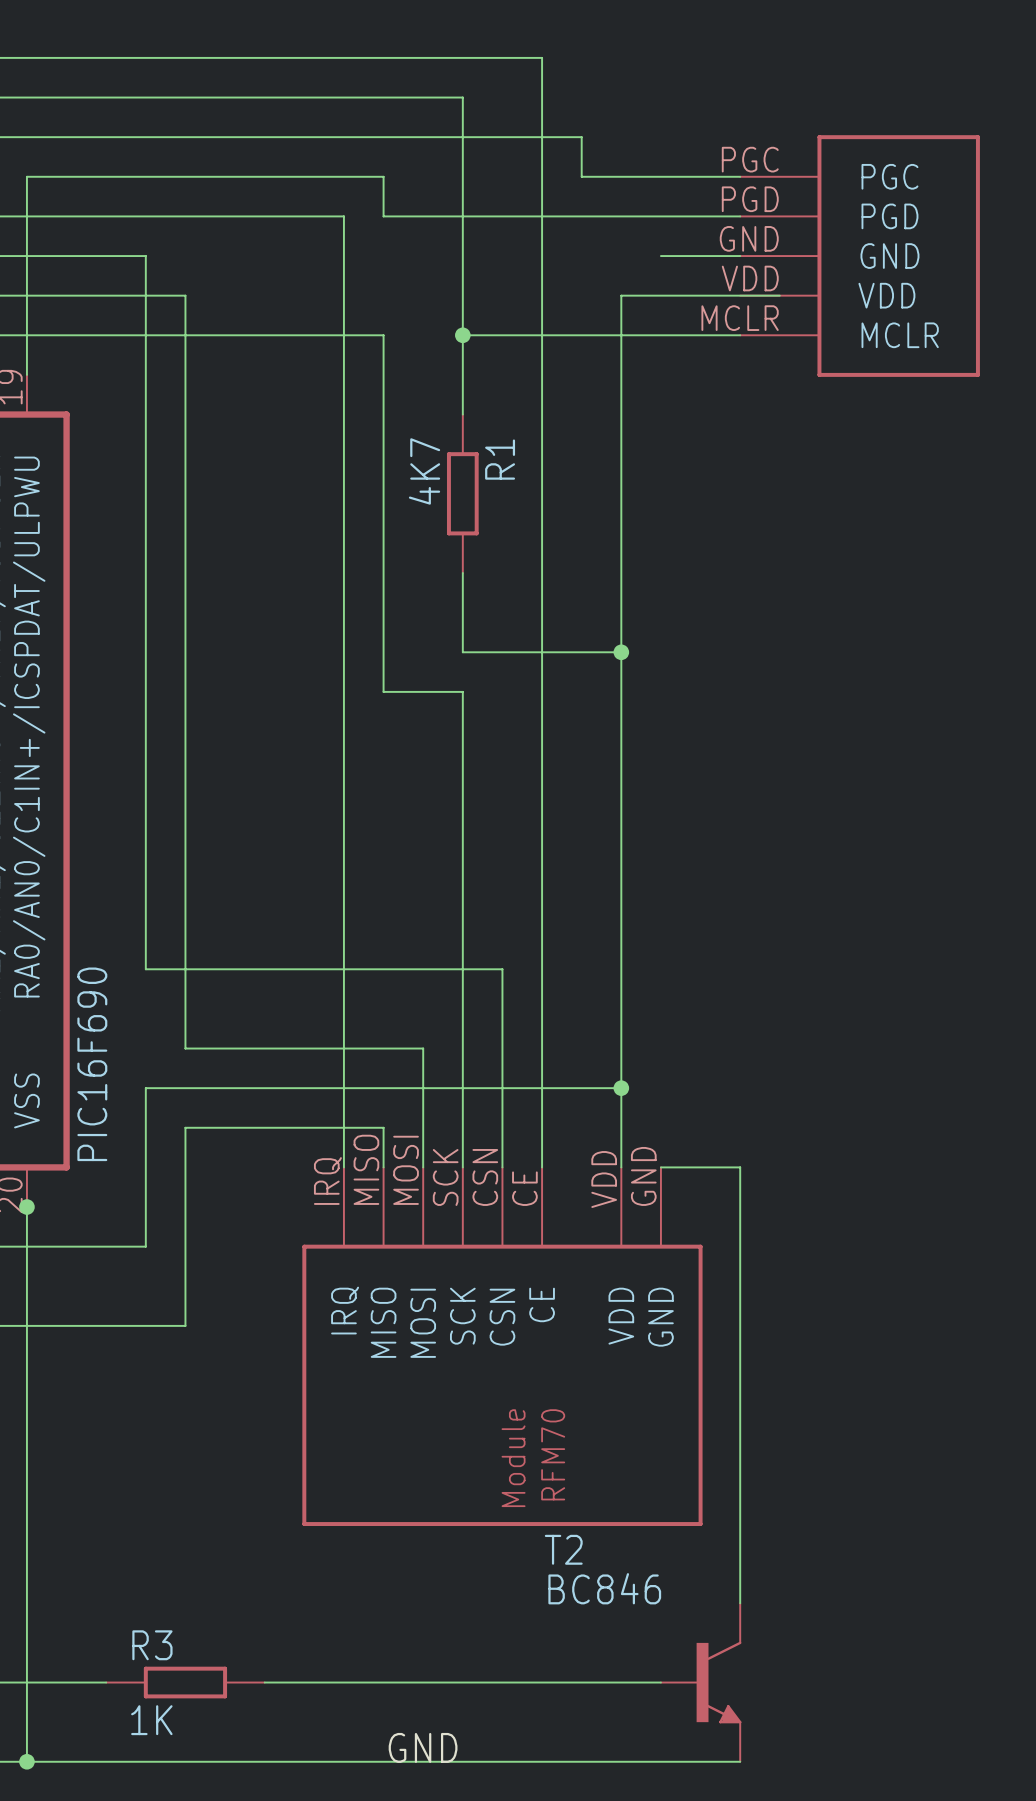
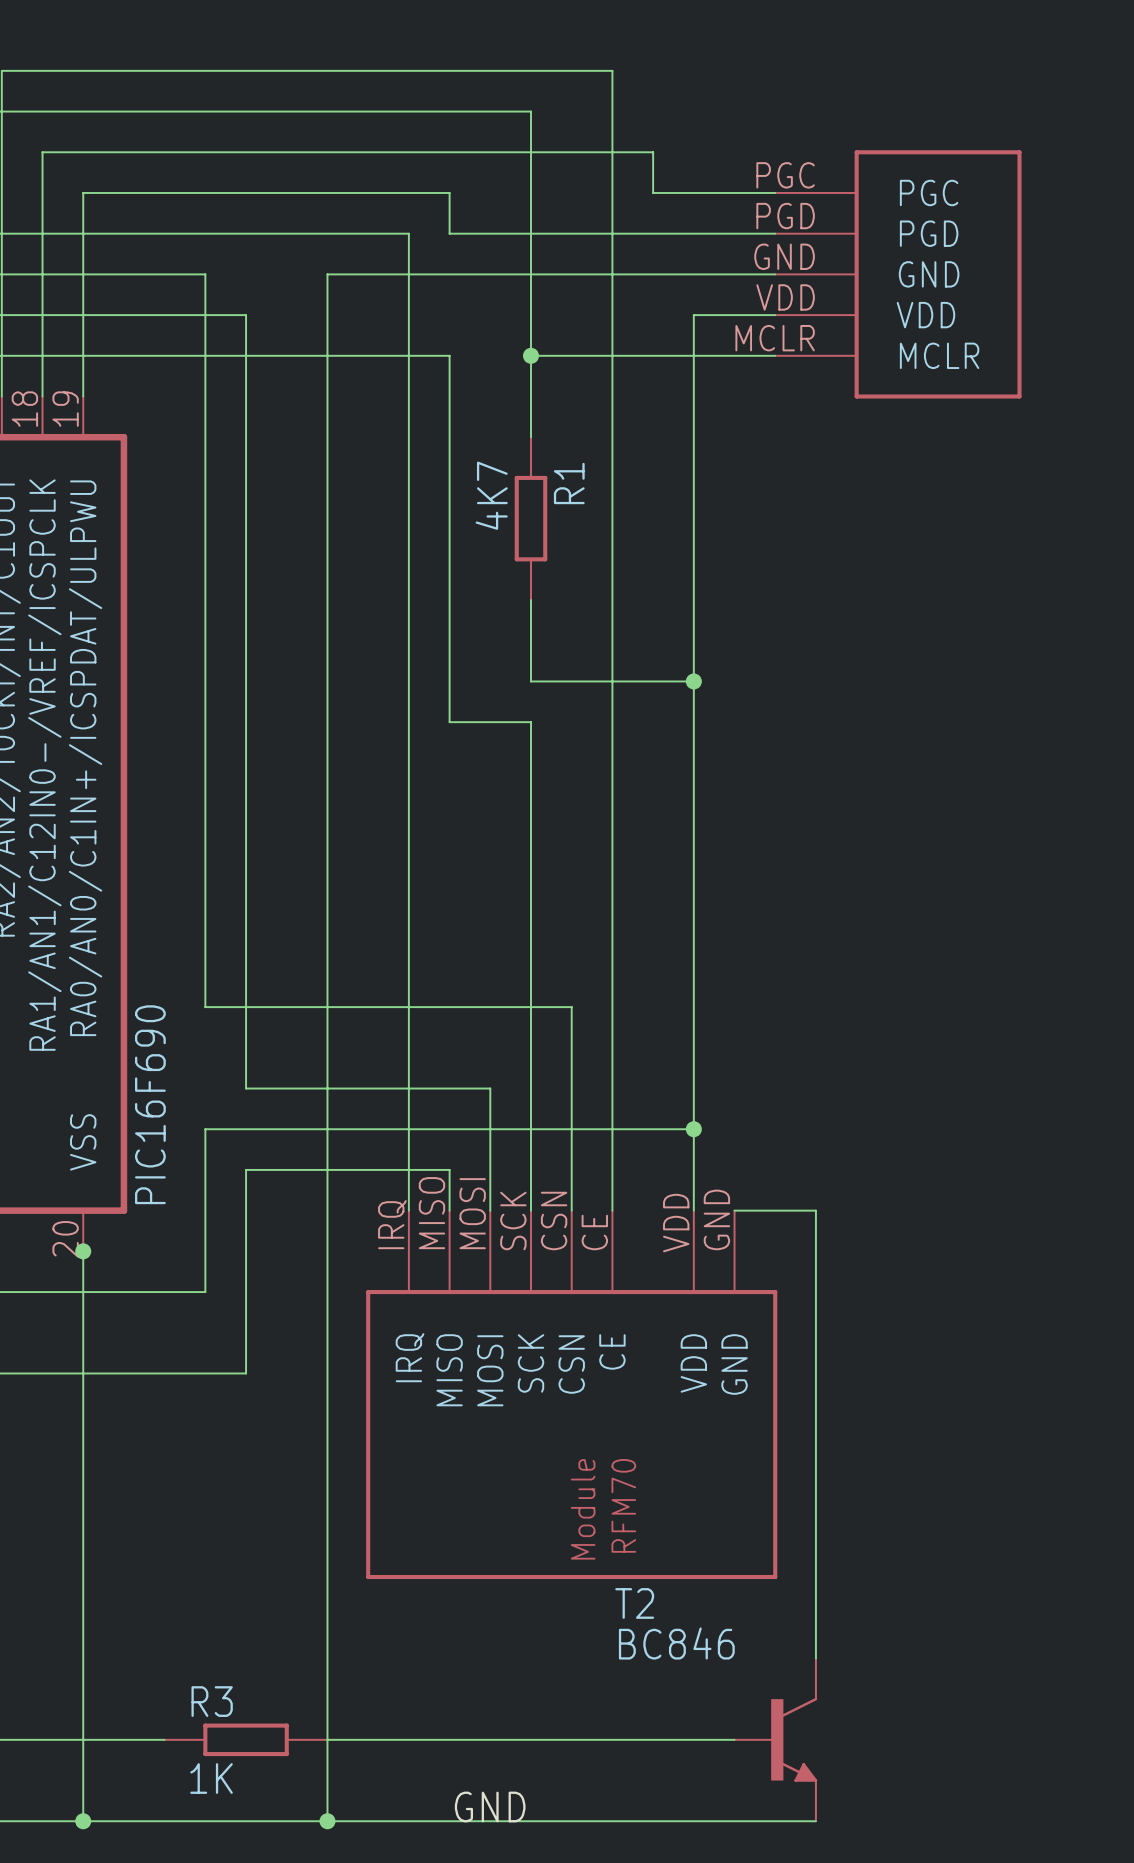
wire: none -> (734, 274) (327, 274) (327, 1821)
part position: (860, 256) -> (898, 274)
junction: none -> (327, 1821)

